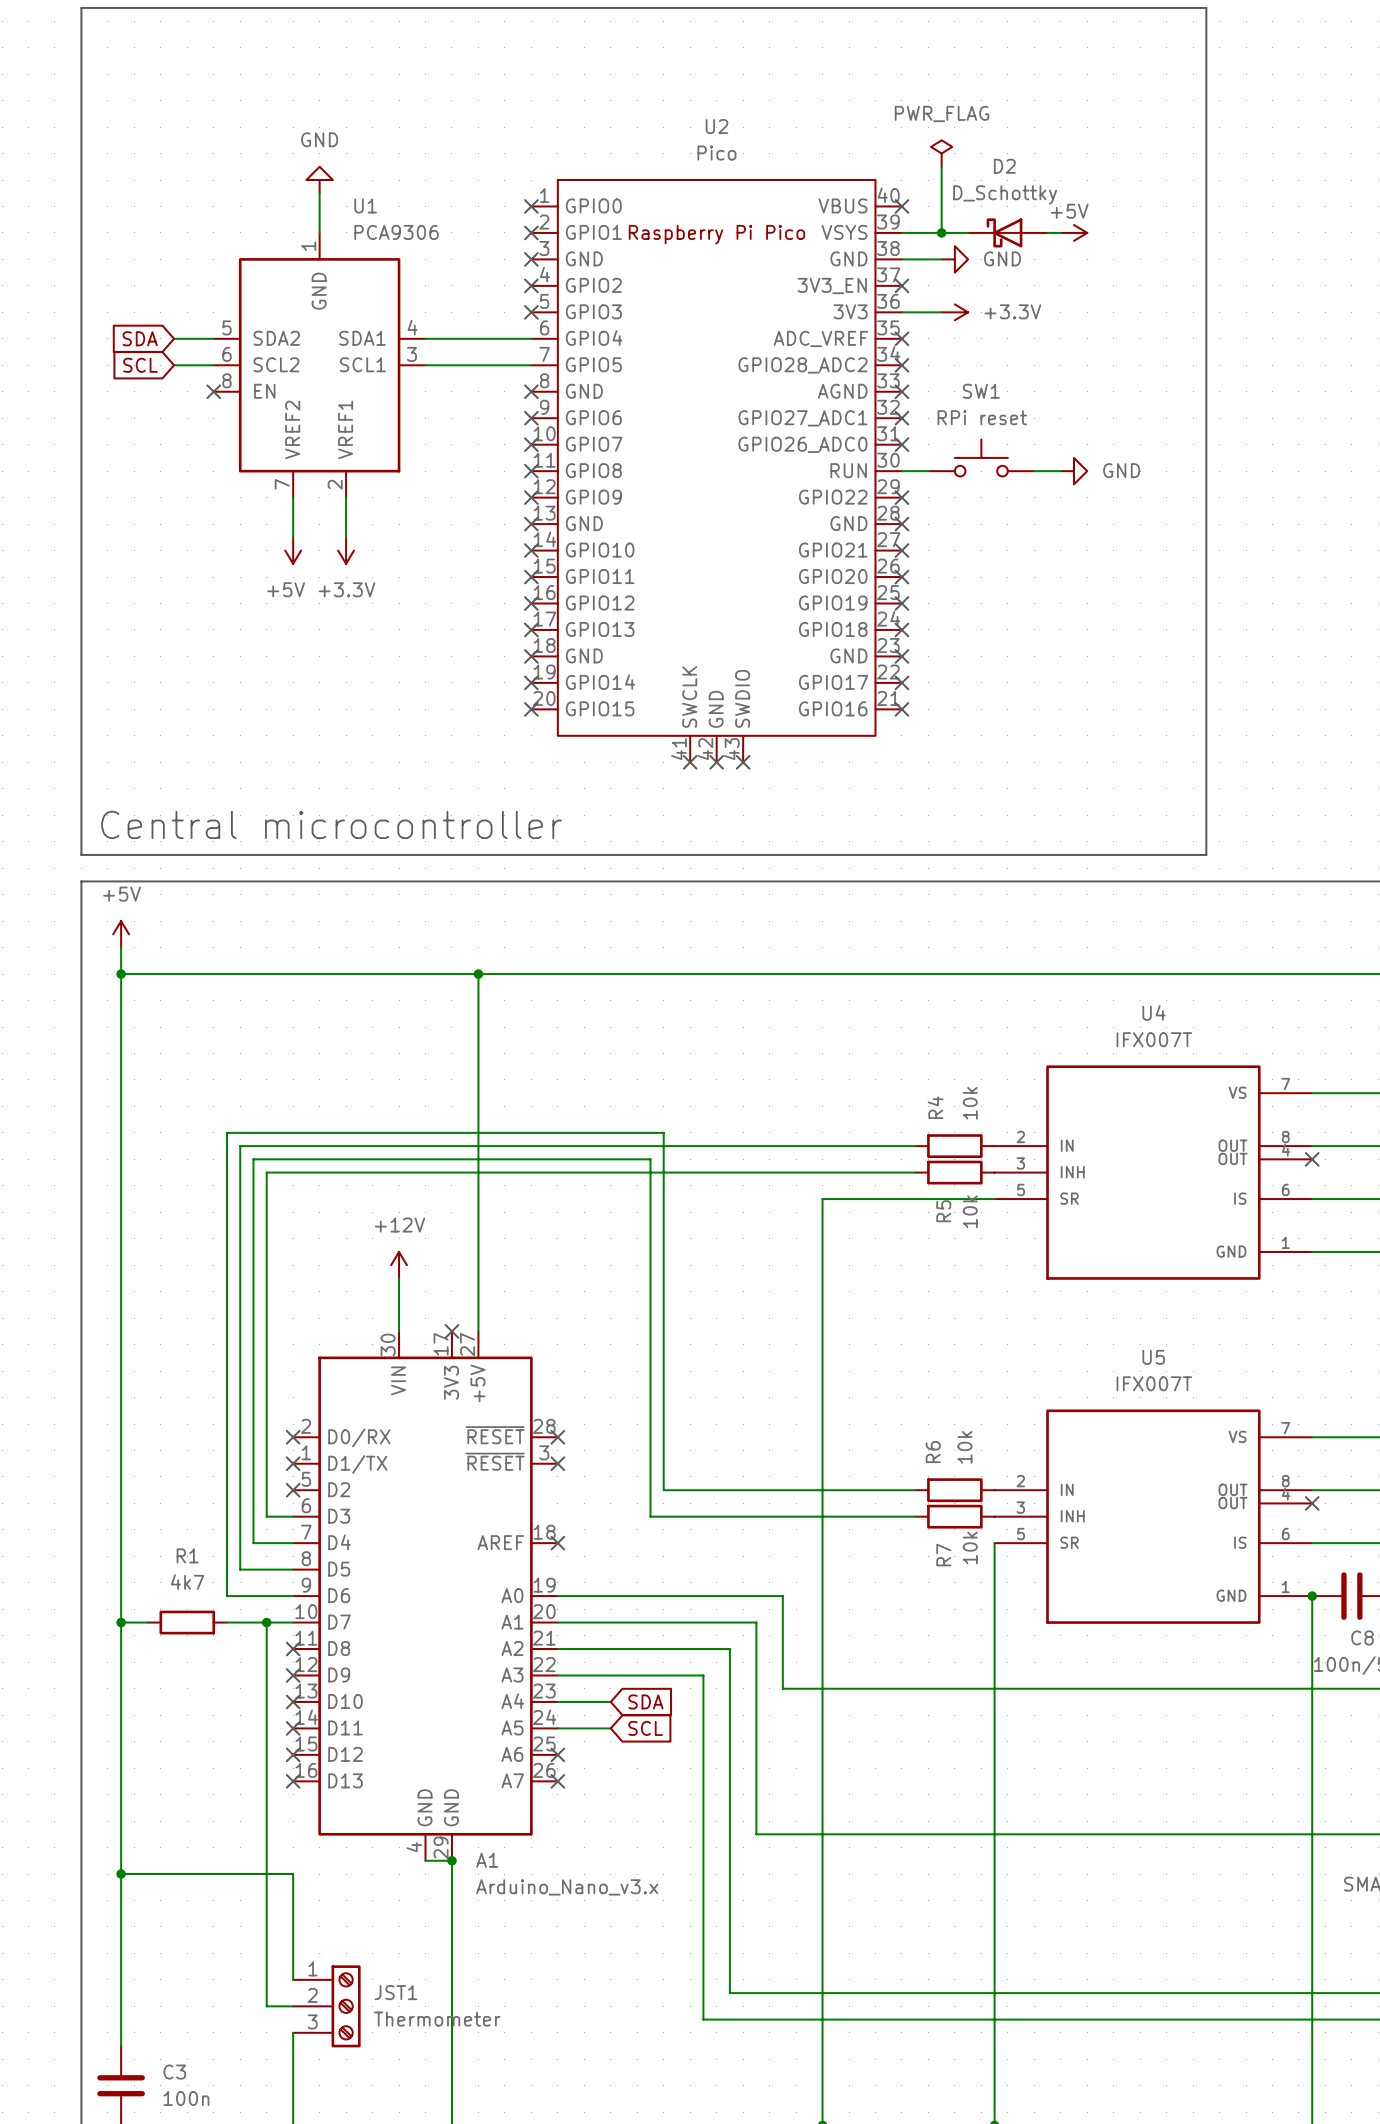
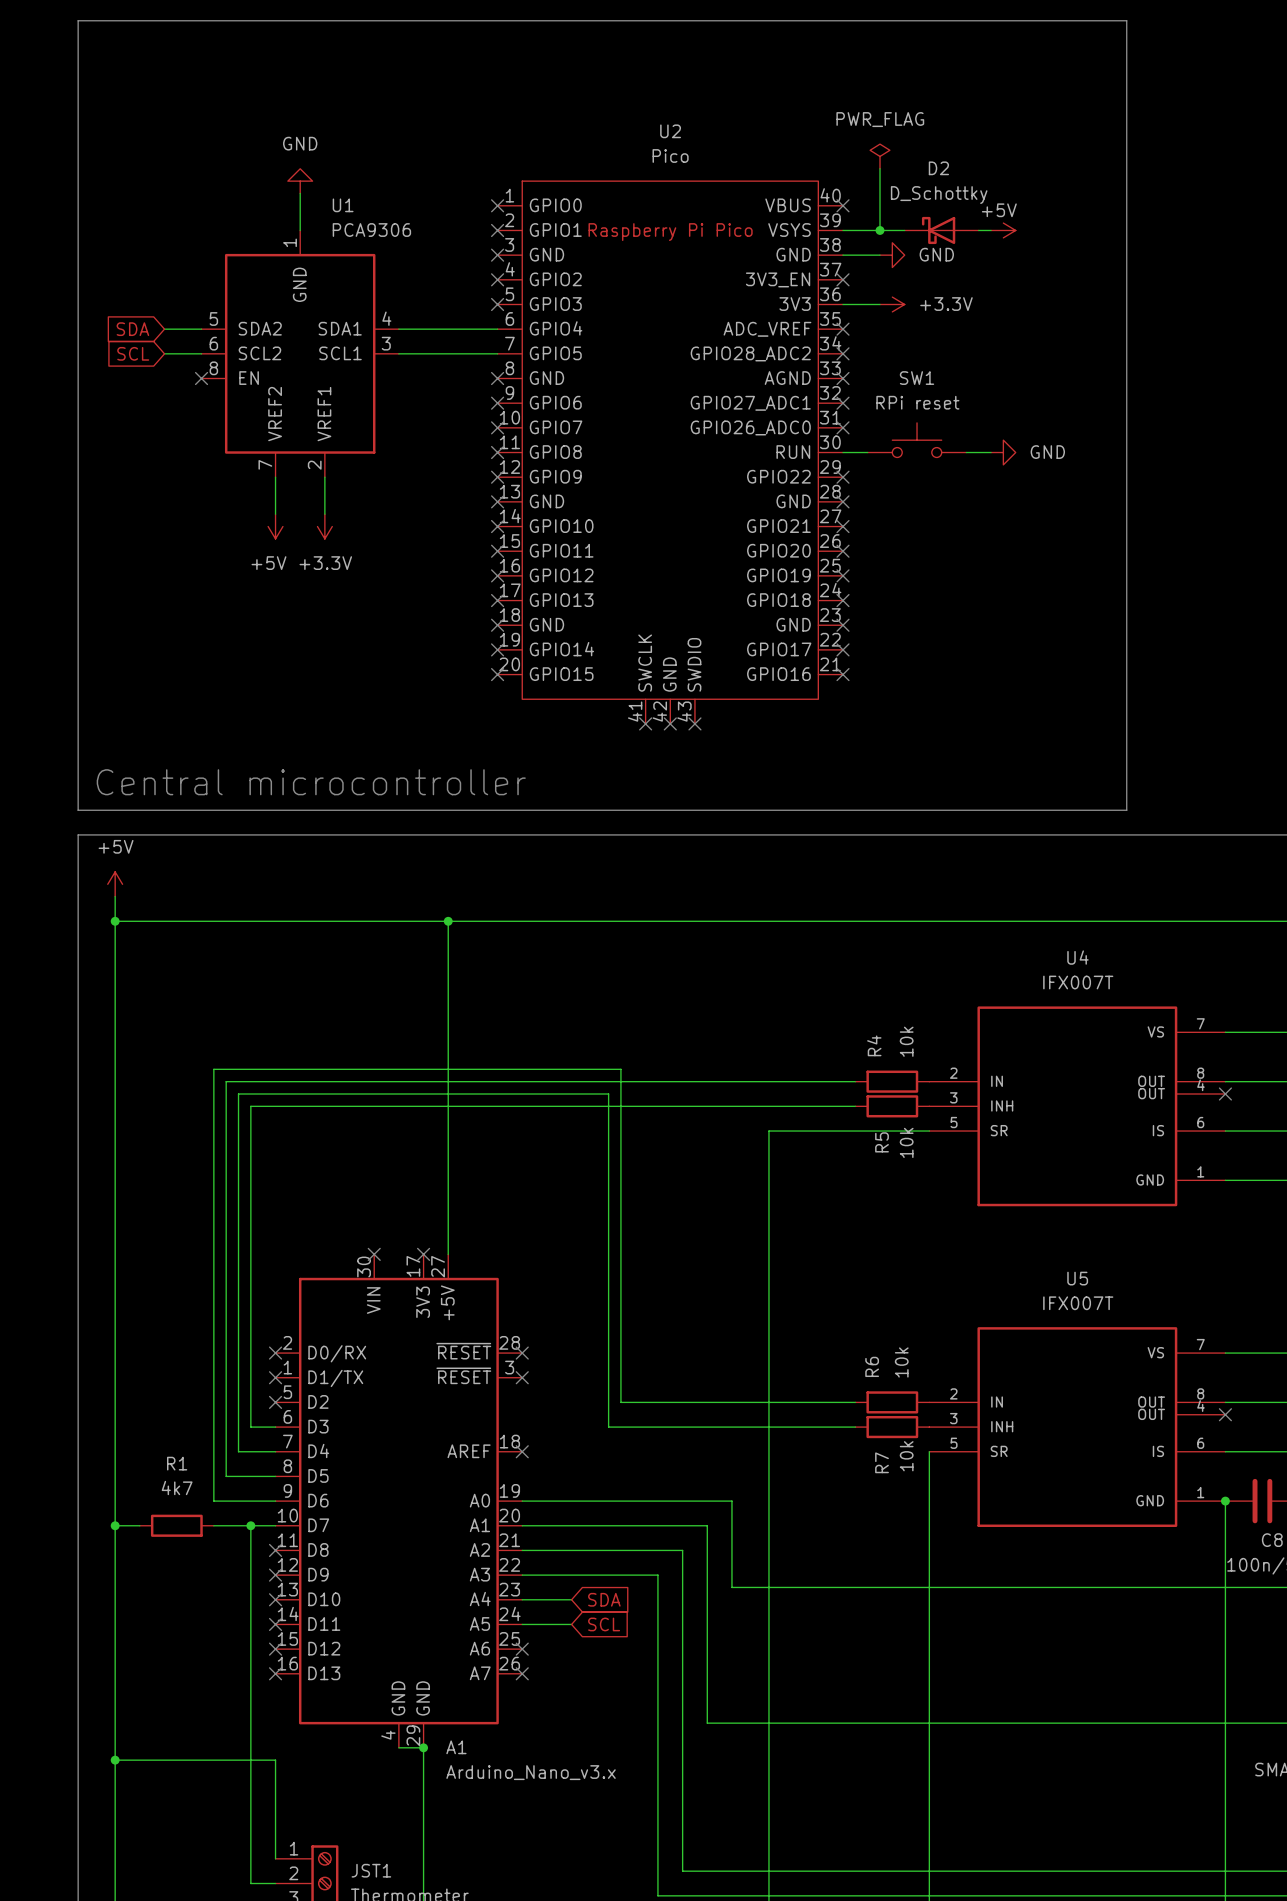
power symbol: +12V (399, 1265) -> none
wire: (399, 1278) (399, 1331) -> none
no-connect mark: none -> (374, 1254)

